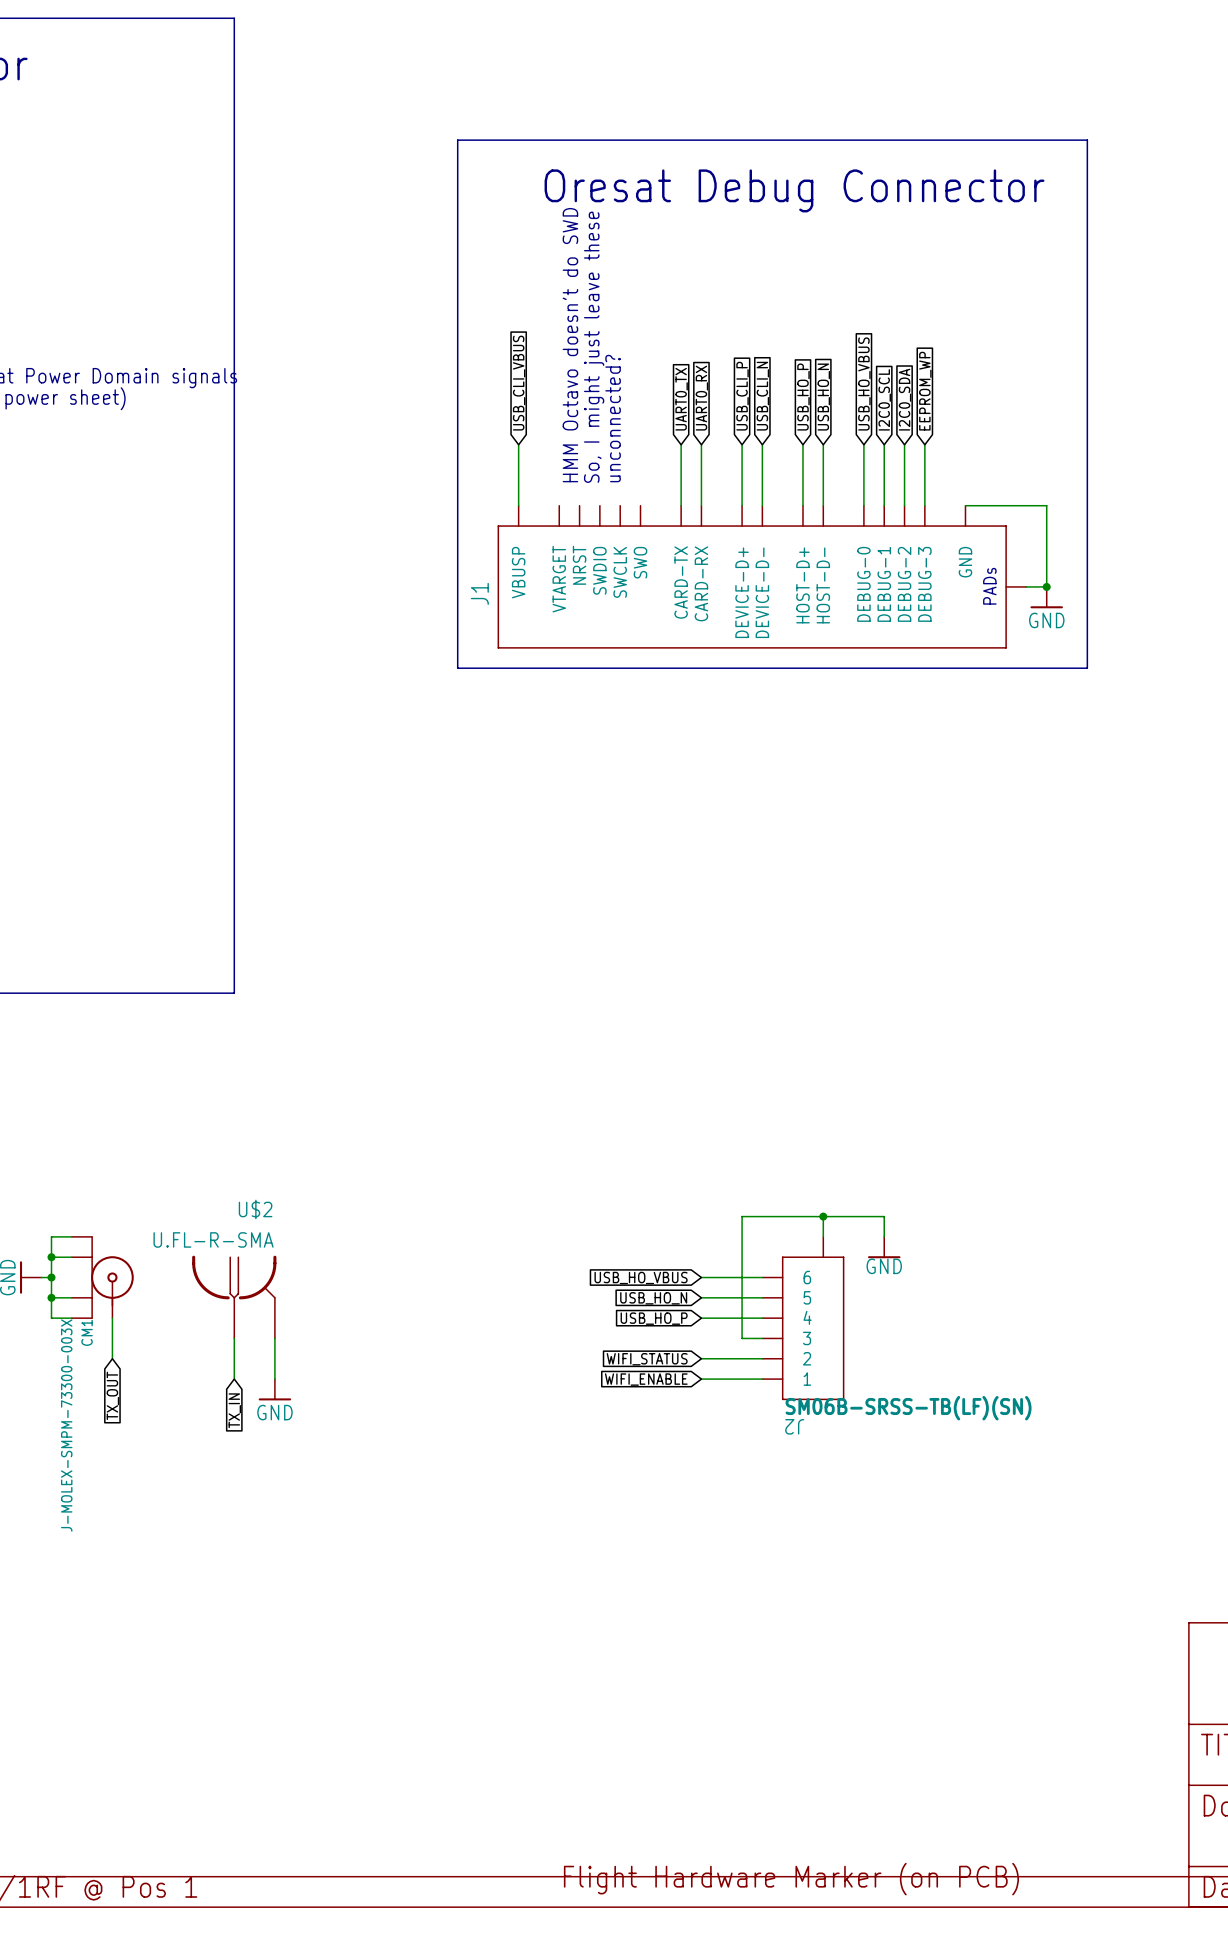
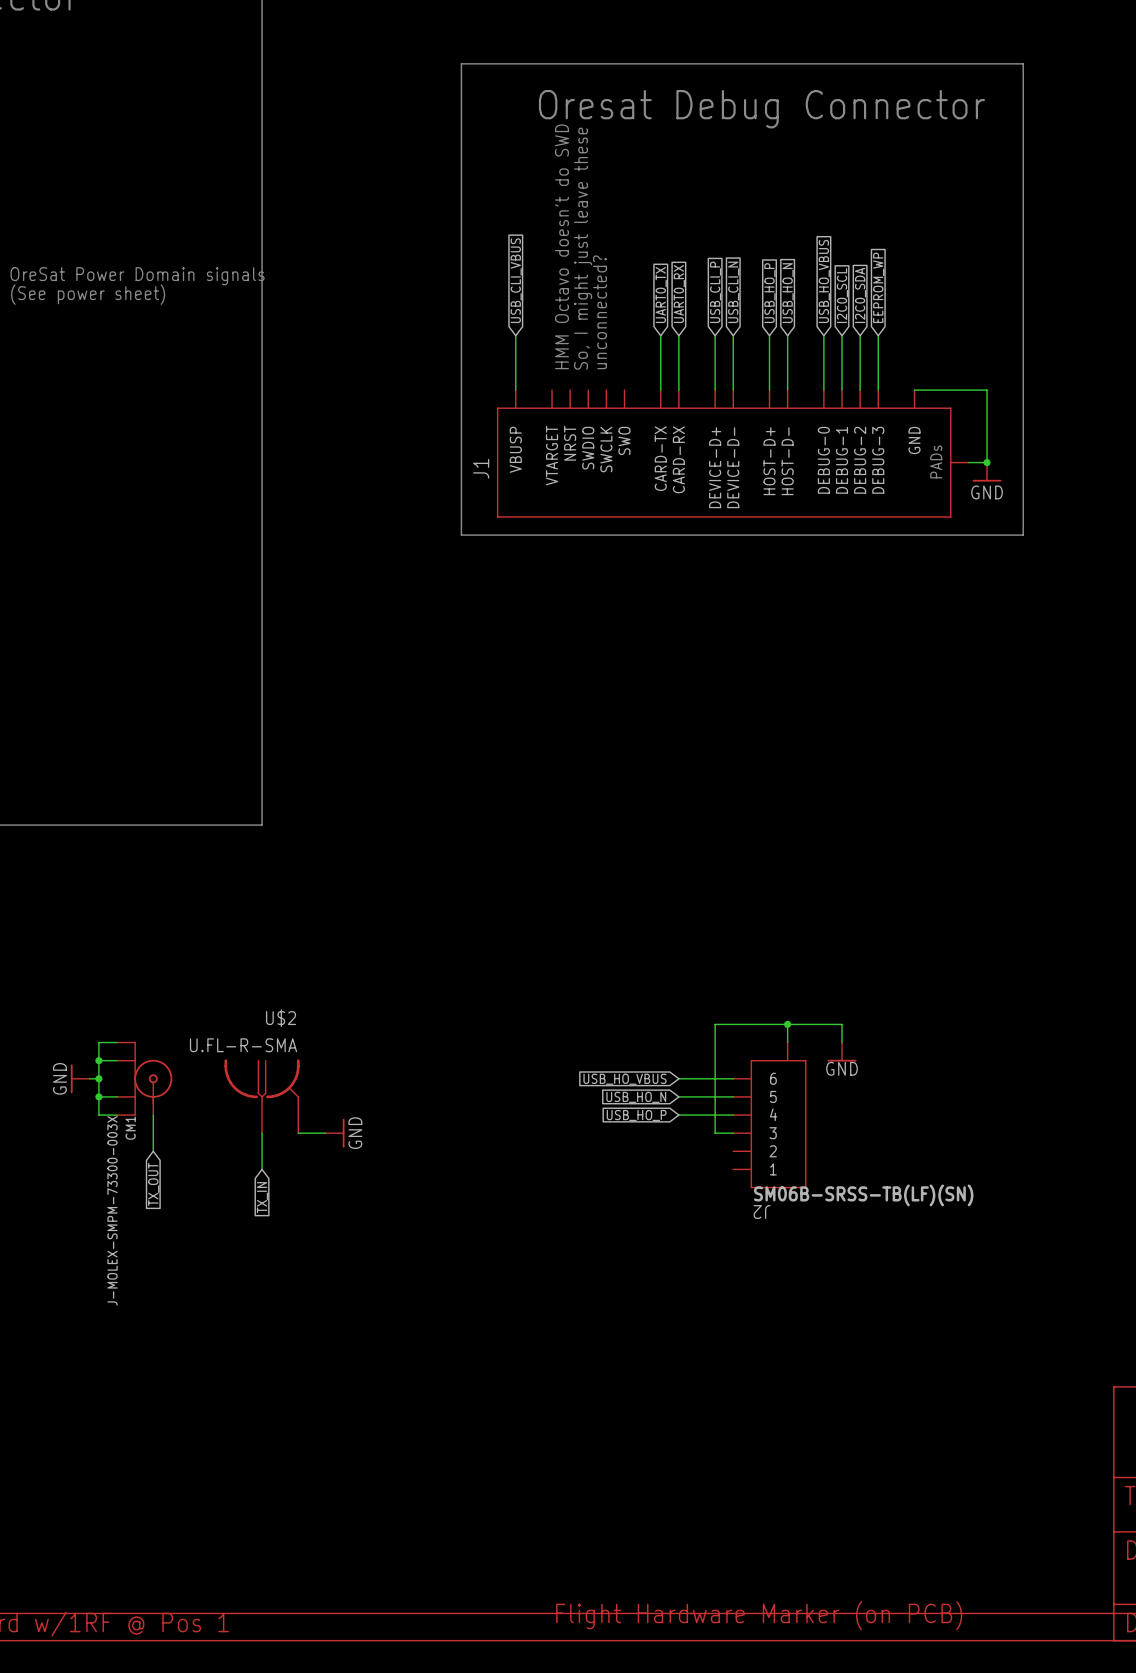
wire: (274, 1338) (274, 1379) -> (298, 1133) (325, 1133)
wire: (701, 1358) (762, 1358) -> none
global label: WIFI_STATUS (647, 1359) -> none
global label: WIFI_ENABLE (646, 1379) -> none
wire: (701, 1379) (762, 1379) -> none
power symbol position: GND (274, 1389) -> GND (334, 1133)
power symbol rotation: 0° (274, 1399) -> 90° counterclockwise (343, 1133)

